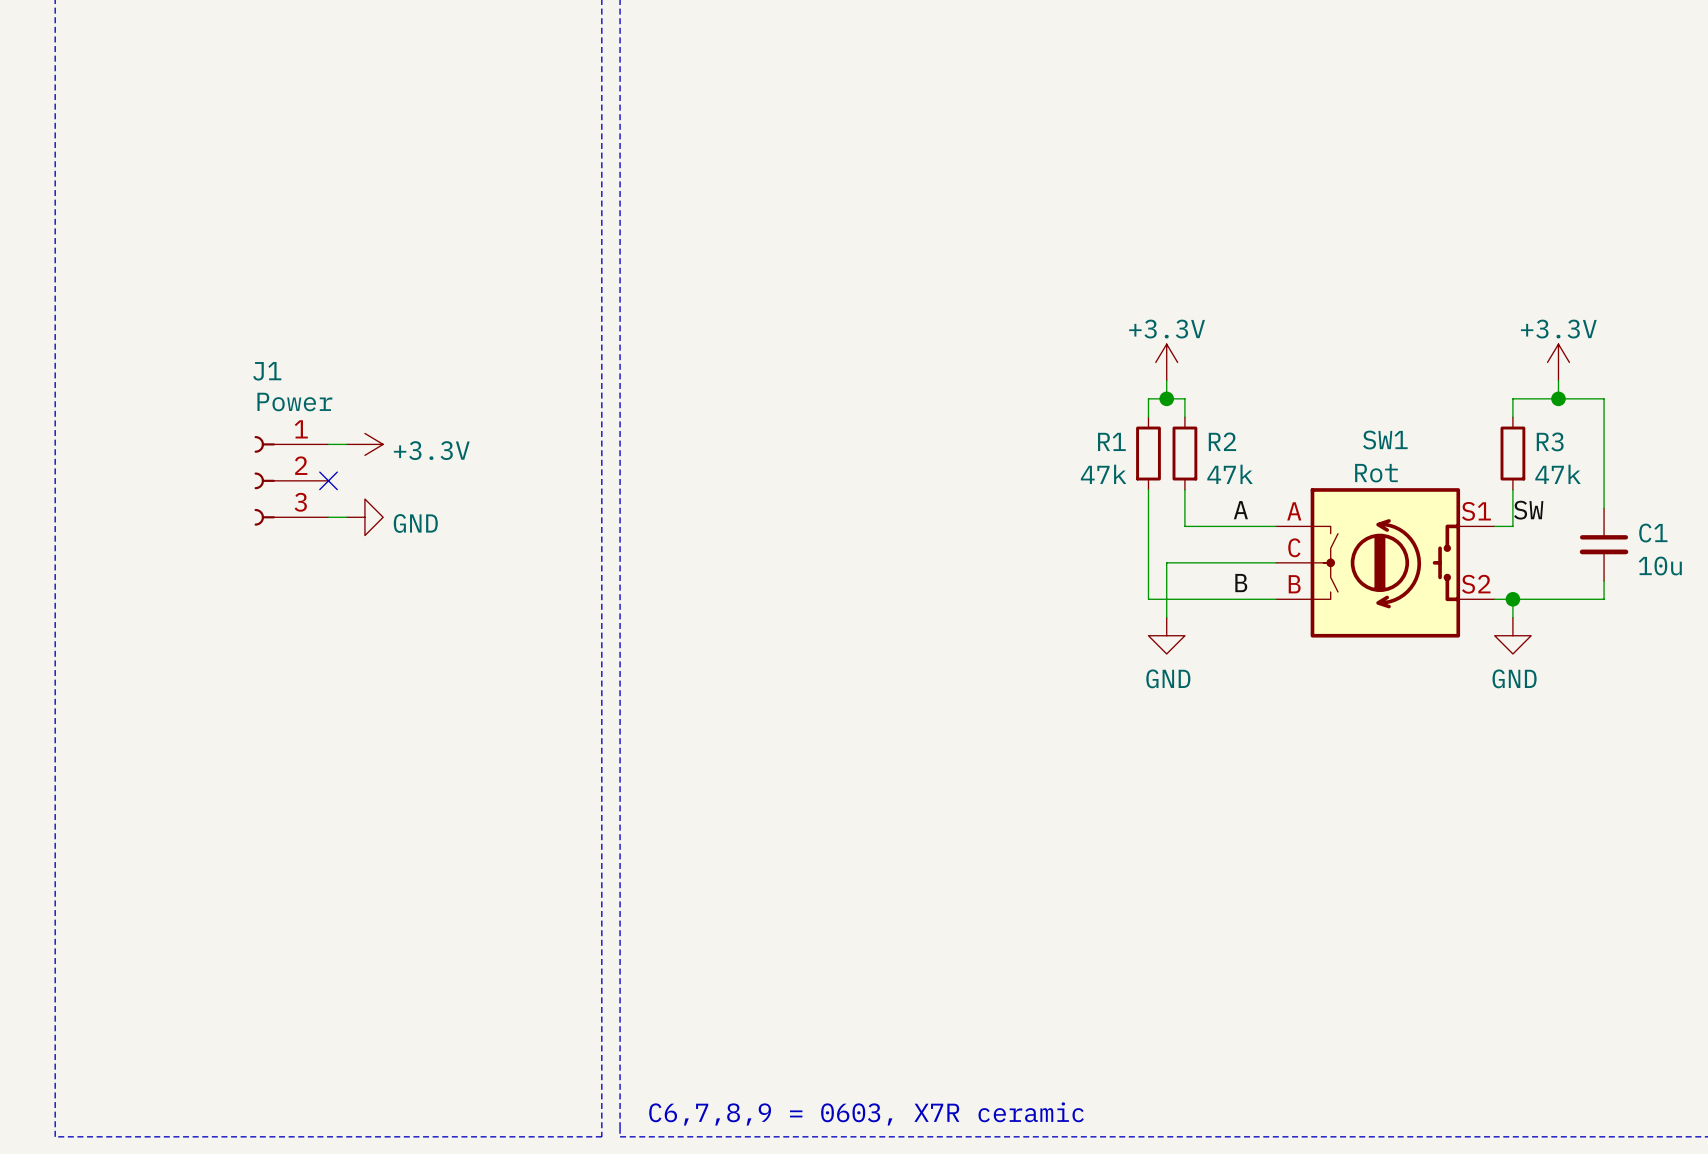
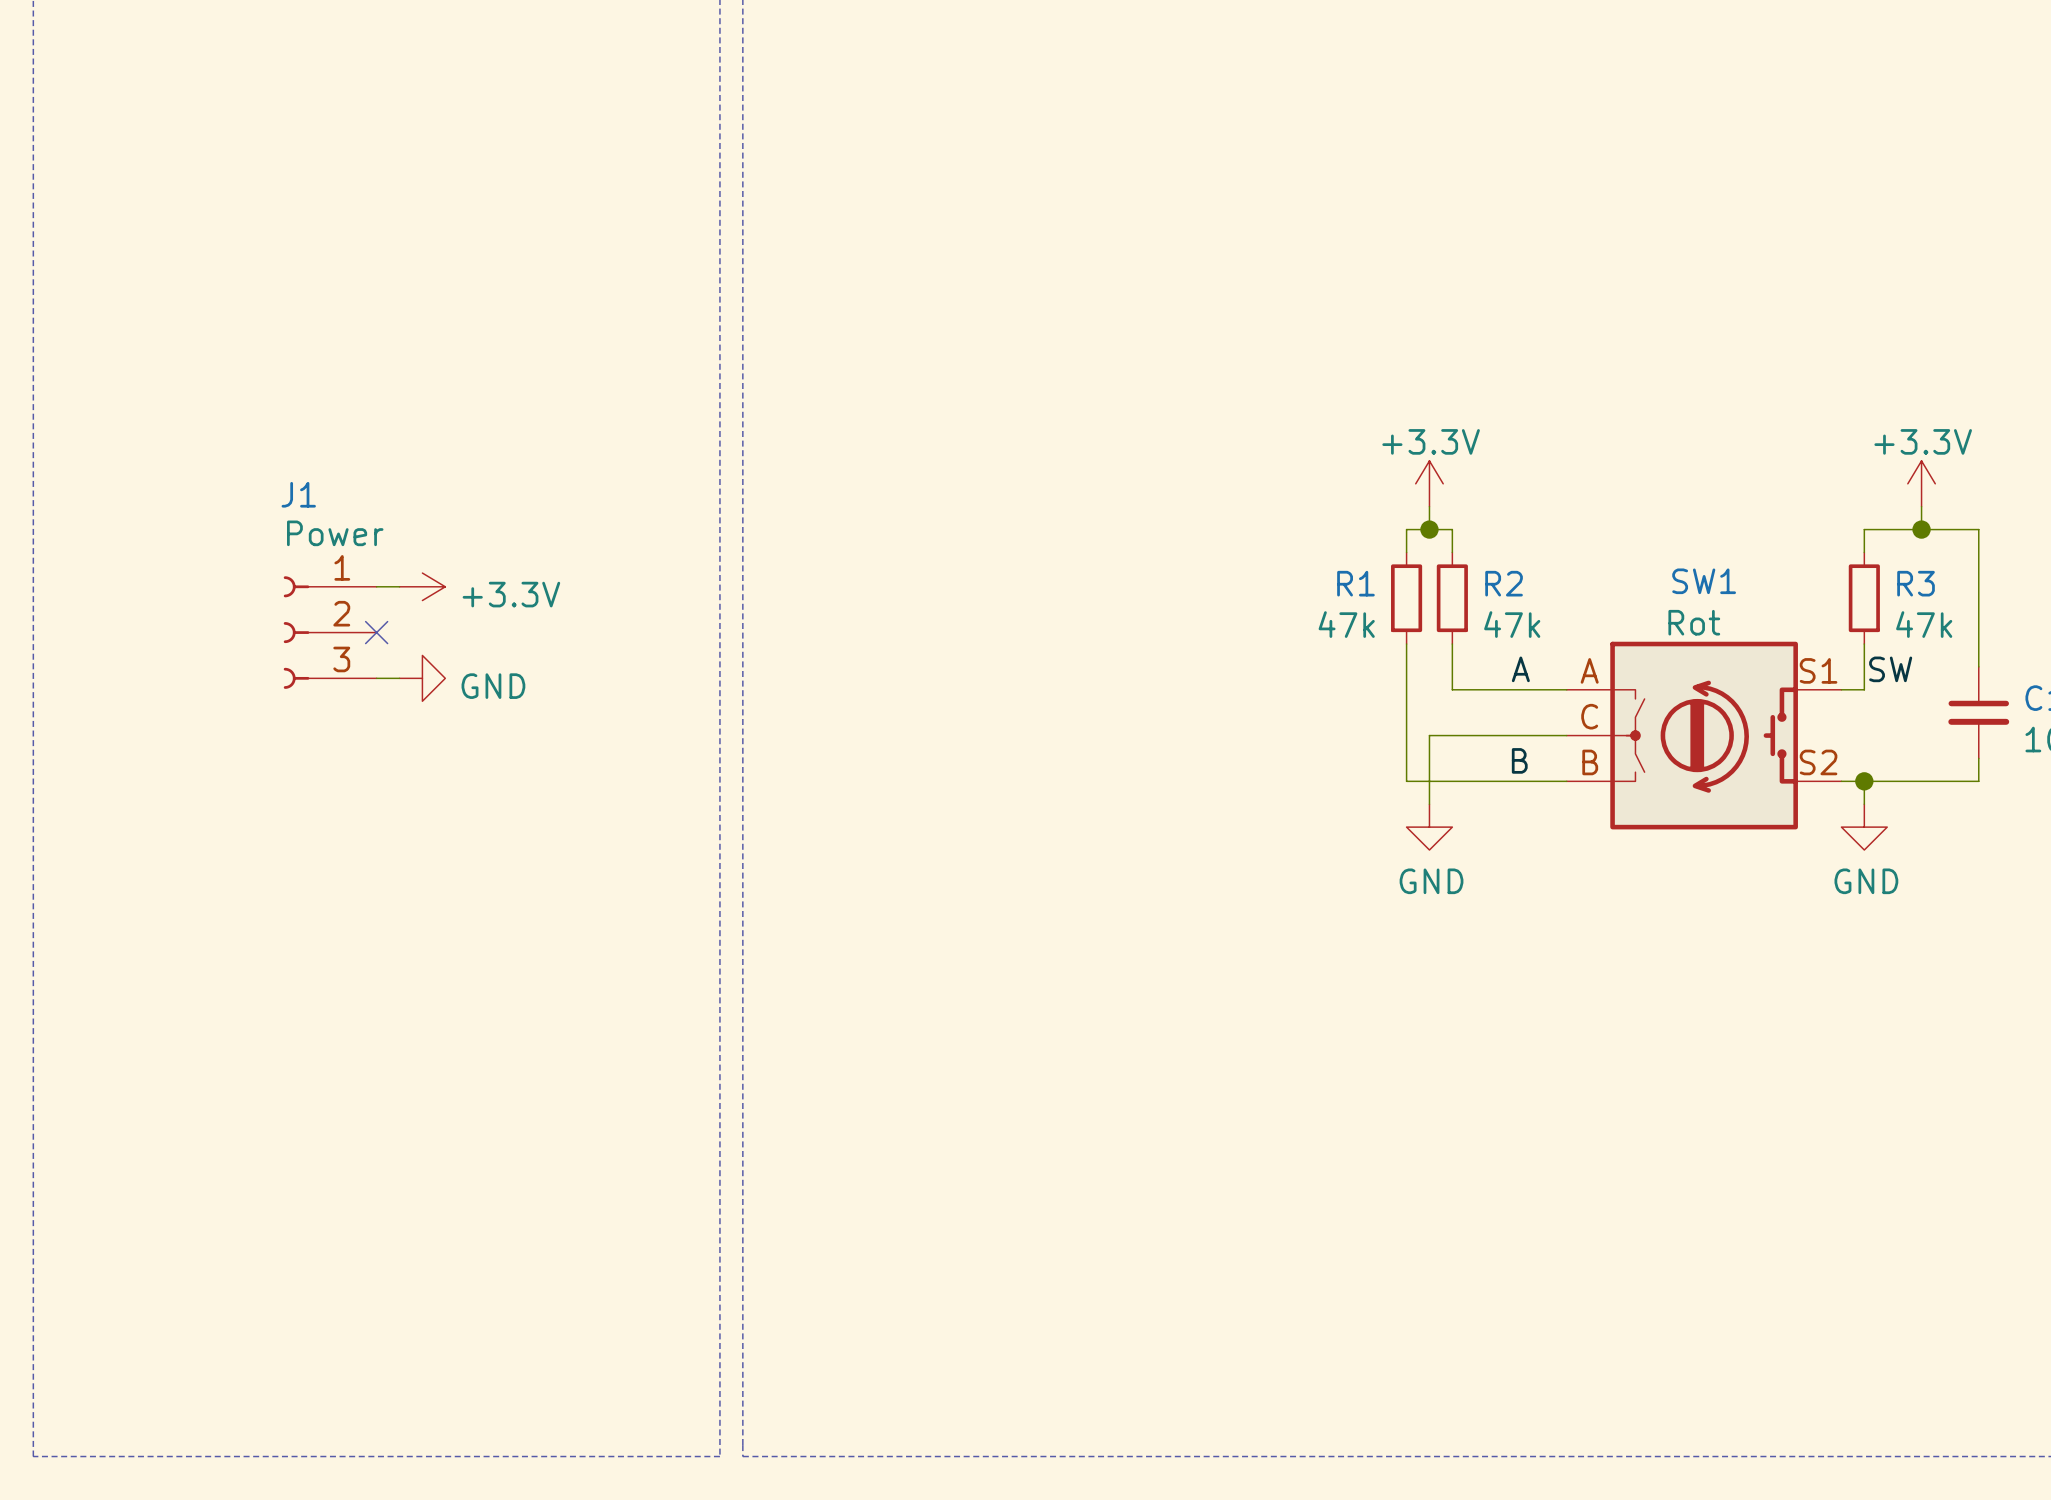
text: C6,7,8,9 = 0603, X7R ceramic (866, 1113) -> none

